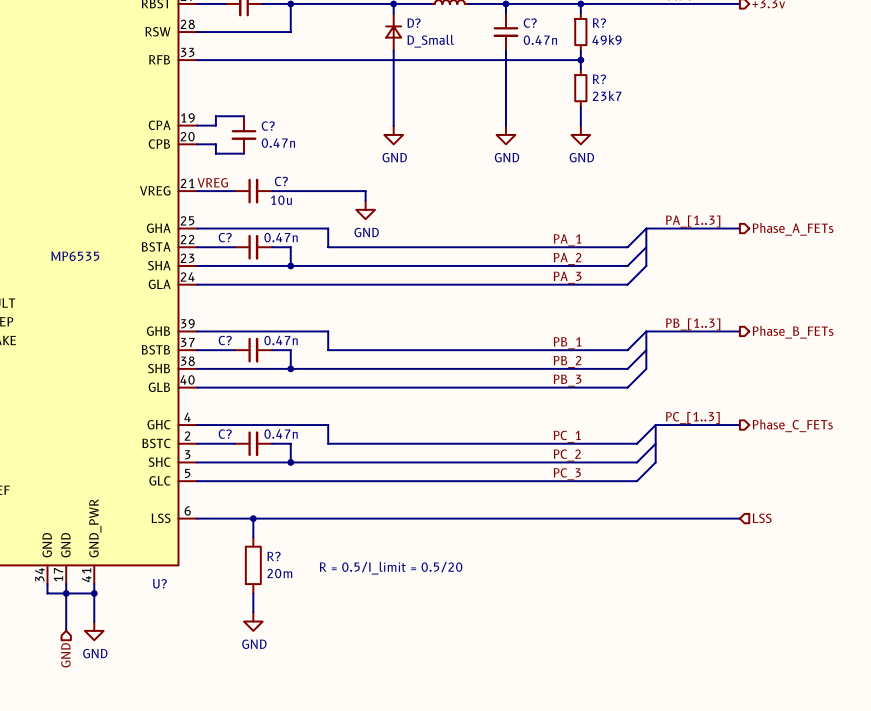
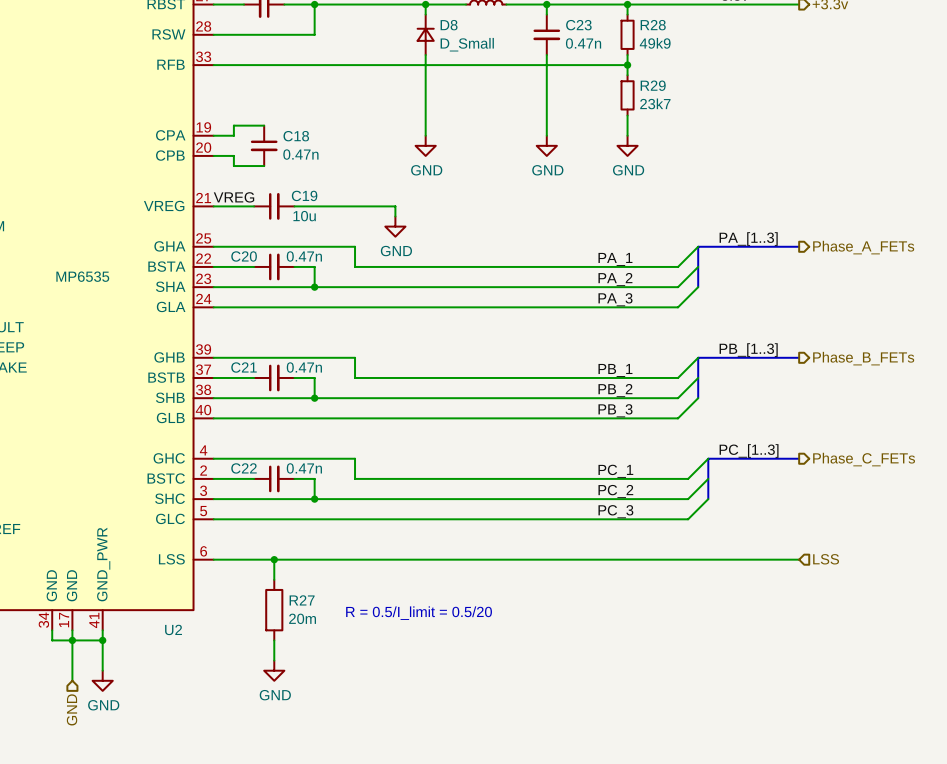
D? name: D? (414, 23) -> D8 (449, 25)
C? name: C? (530, 23) -> C23 (578, 25)
R? name: R? (599, 23) -> R28 (653, 25)
R? name: R? (599, 79) -> R29 (653, 85)
C? name: C? (268, 126) -> C18 (296, 136)
C? name: C? (281, 181) -> C19 (304, 195)
C? name: C? (225, 237) -> C20 (244, 256)
C? name: C? (225, 340) -> C21 (244, 367)
C? name: C? (225, 434) -> C22 (244, 468)
R? name: R? (274, 556) -> R27 (302, 600)
U? name: U? (159, 583) -> U2 (173, 629)

